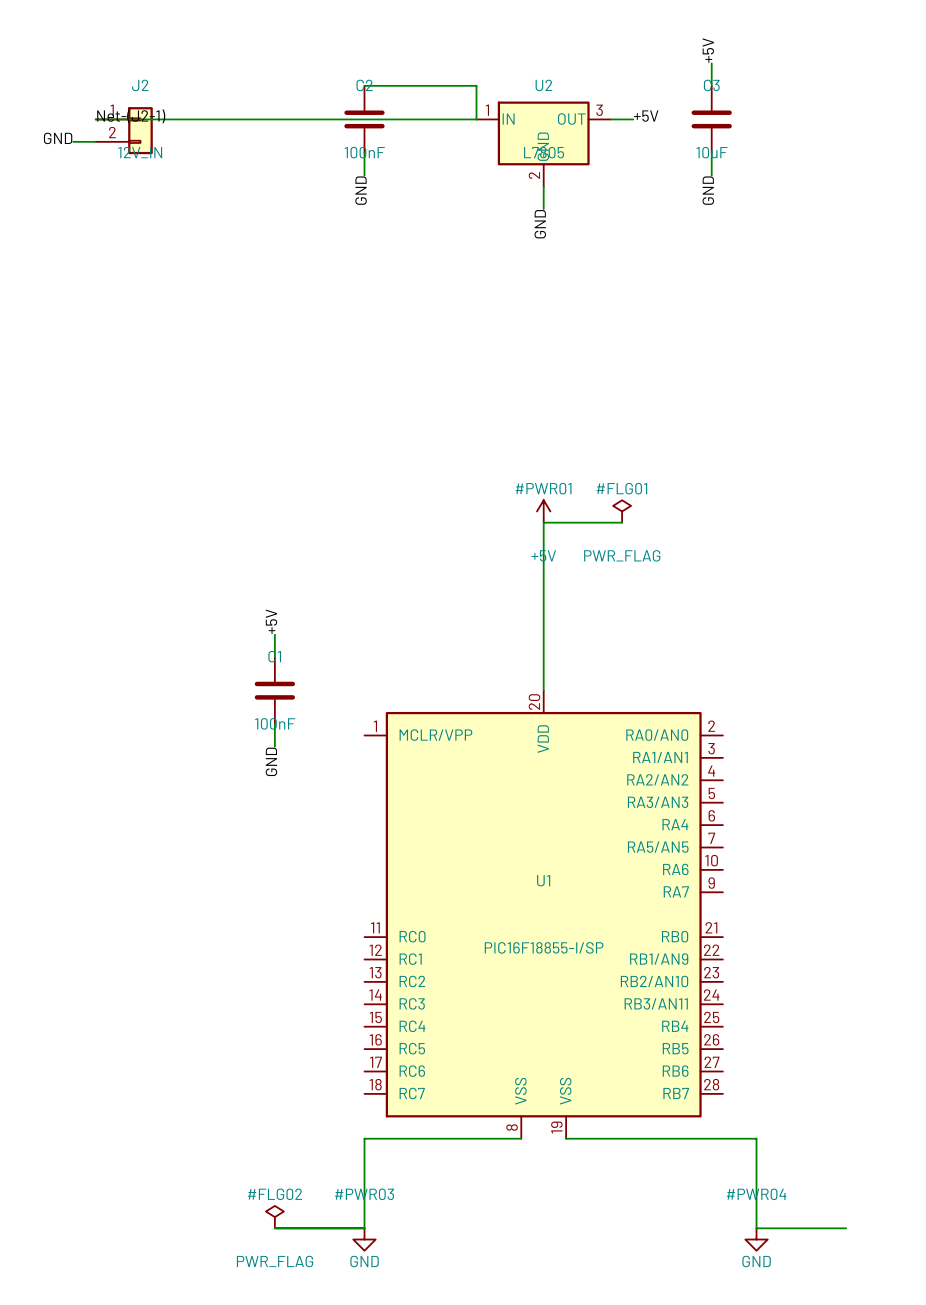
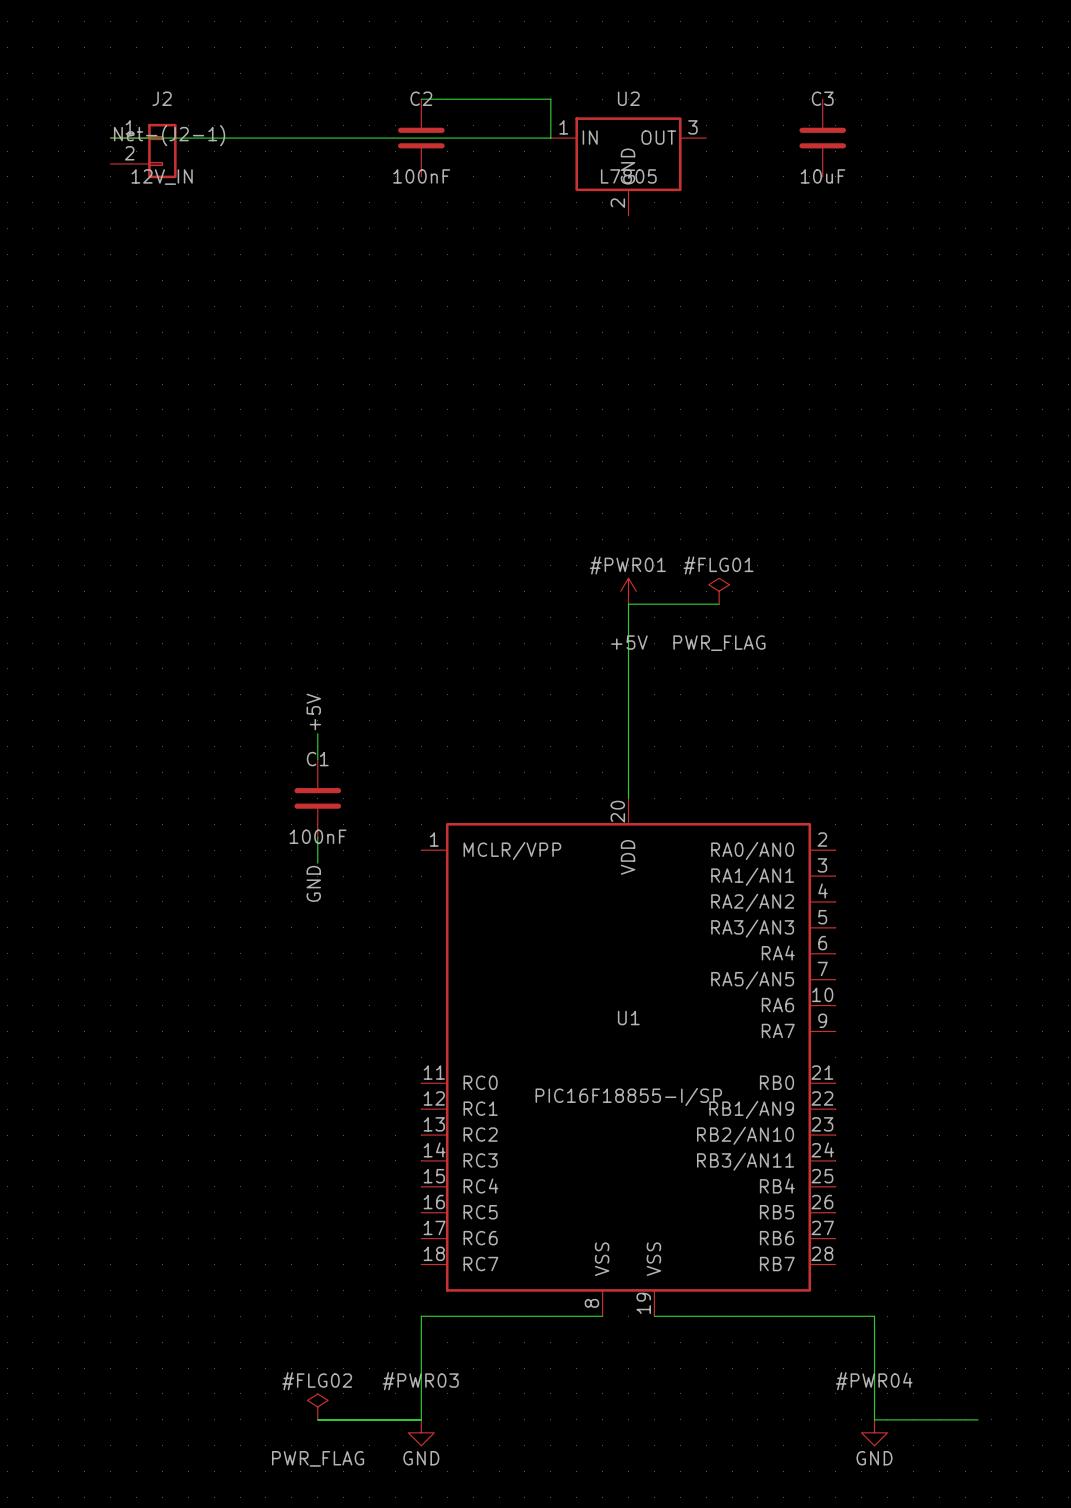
label: +5V (708, 50) -> none
wire: (711, 63) (711, 85) -> none
label: +5V (646, 116) -> none
wire: (610, 119) (633, 119) -> none
label: GND (58, 138) -> none
wire: (73, 141) (95, 141) -> none
wire: (364, 153) (364, 175) -> none
wire: (711, 153) (711, 175) -> none
wire: (543, 186) (543, 209) -> none
label: GND (361, 190) -> none
label: GND (708, 190) -> none
label: GND (540, 224) -> none

